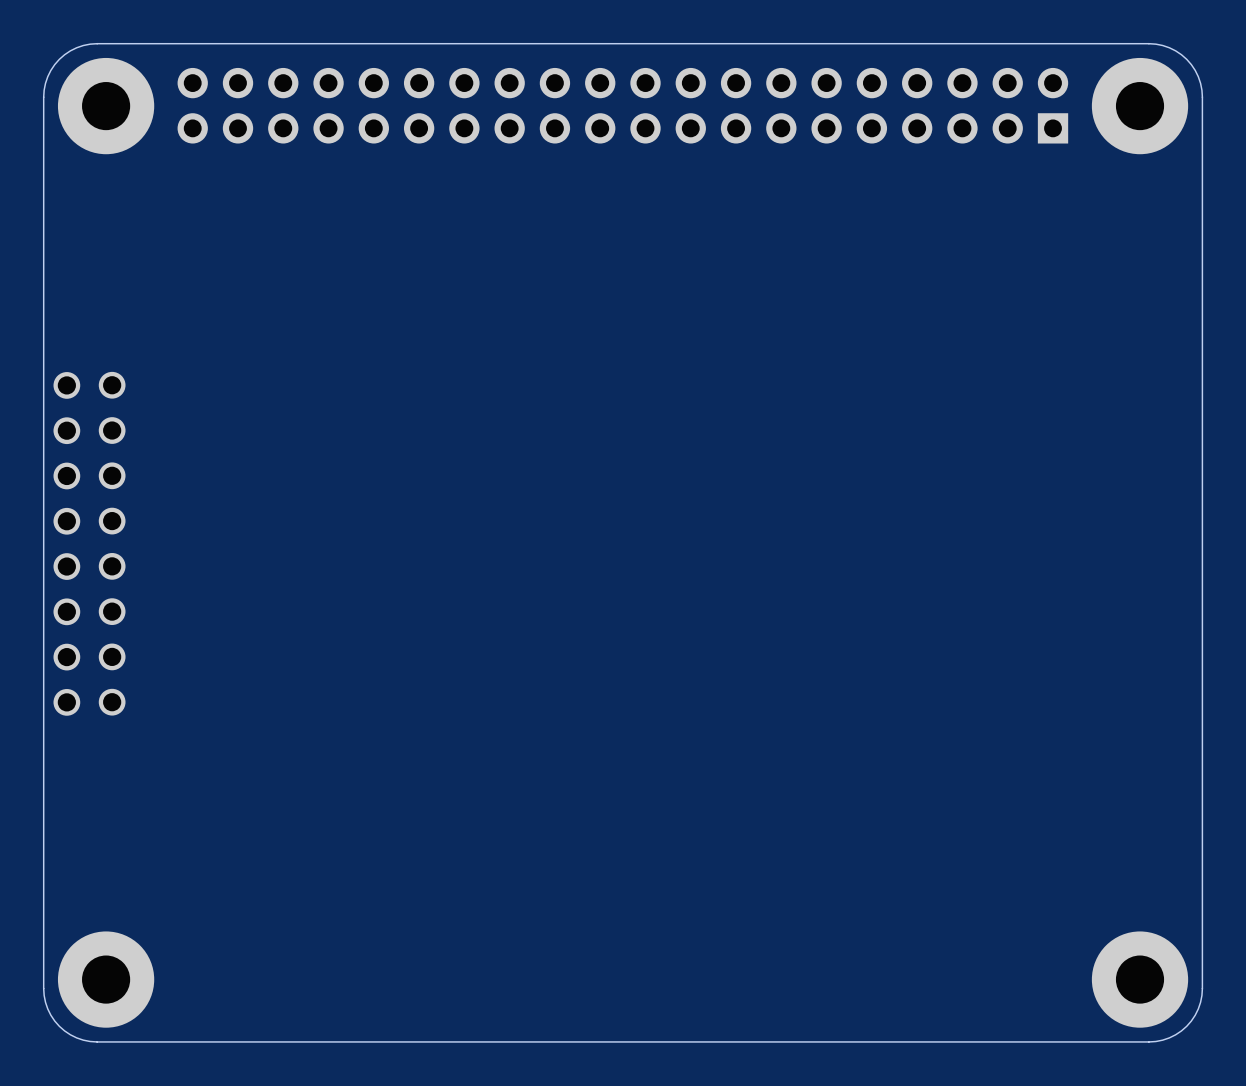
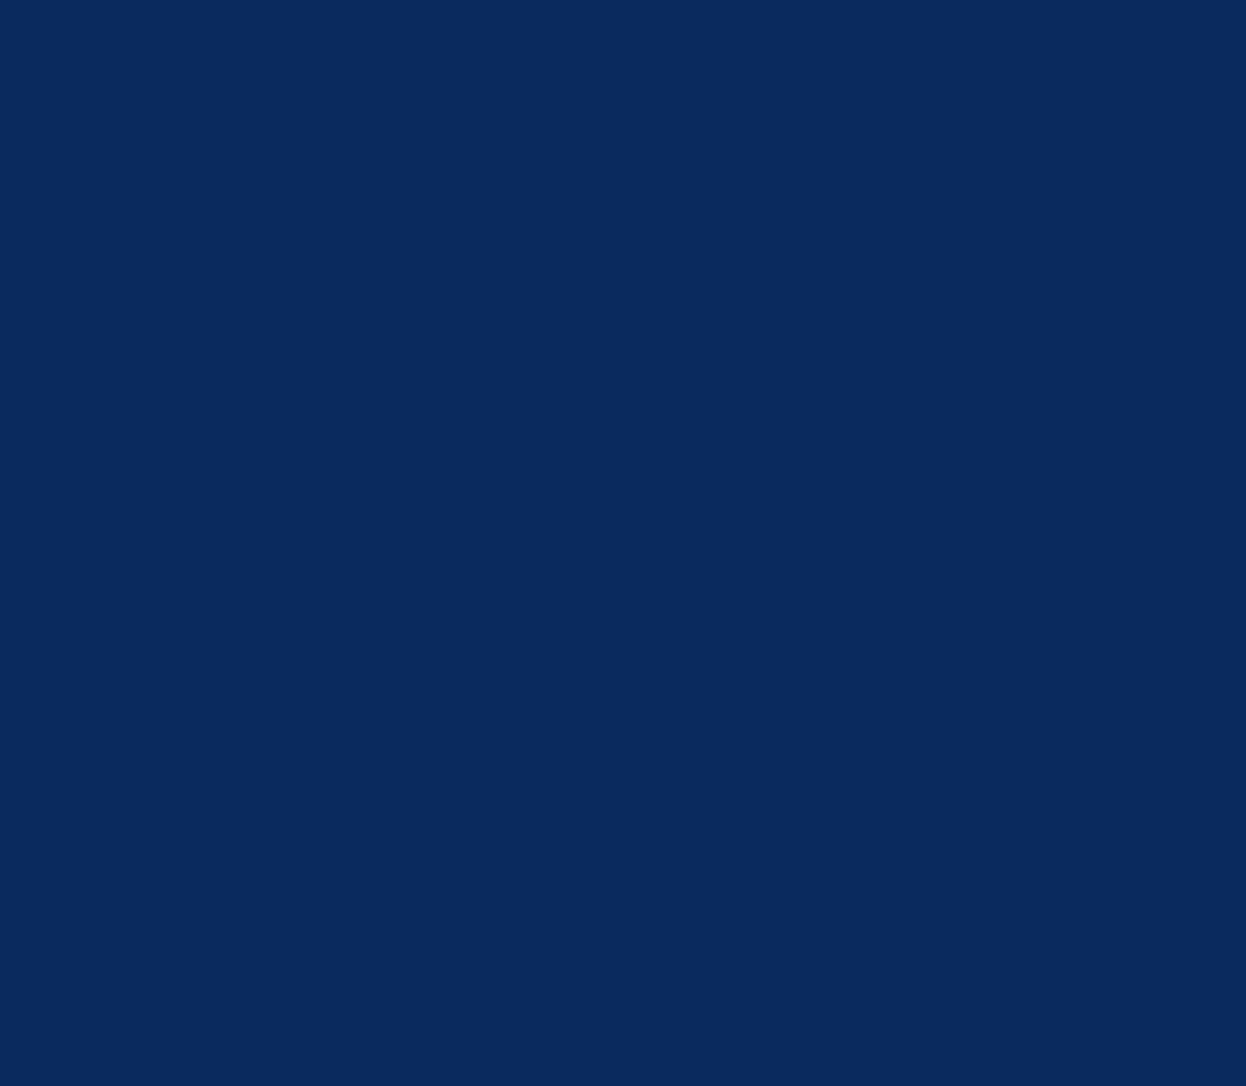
board edge: (1148, 43) (97, 43) (76, 47) (59, 59) (47, 76) (43, 97) (43, 988) (47, 1008) (59, 1026) (76, 1037) (97, 1041) (1148, 1041) (1169, 1037) (1186, 1026) (1198, 1008) (1202, 988) (1202, 97) (1198, 76) (1186, 59) (1169, 47) (1148, 43) -> none
part: (622, 105) -> none
part: (106, 106) -> none
part: (1140, 106) -> none
part: (89, 543) -> none
part: (106, 979) -> none
part: (1140, 979) -> none

